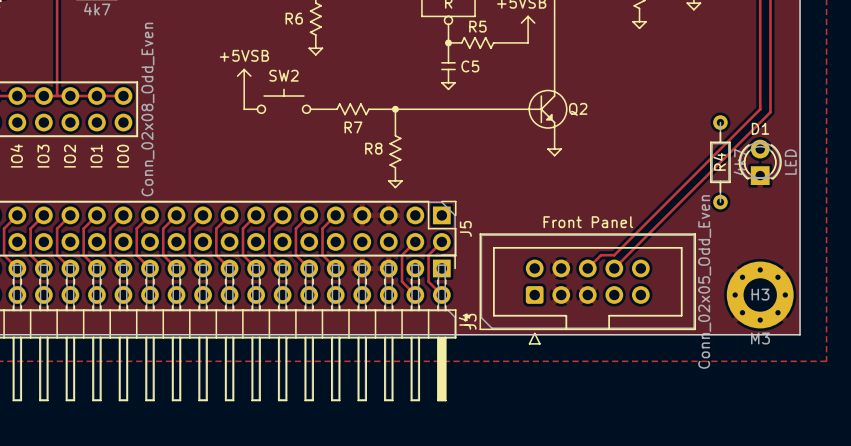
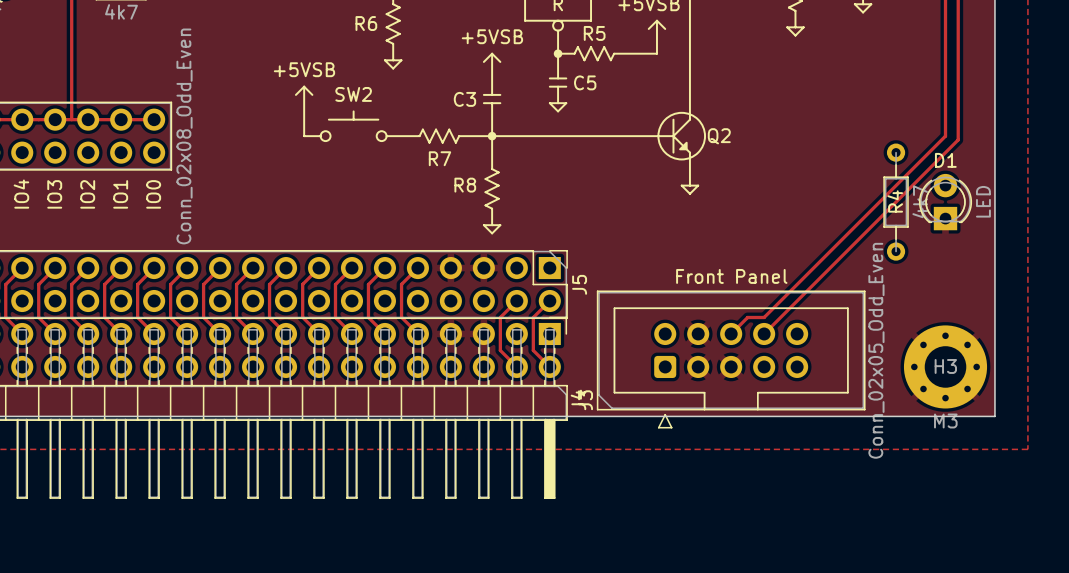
text: none -> +5VSB (492, 36)
line: none -> (492, 53) (492, 94)
line: none -> (492, 53) (483, 61)
line: none -> (492, 53) (500, 61)
line: none -> (483, 94) (500, 94)
text: none -> C3 (464, 99)
line: none -> (483, 103) (500, 103)
line: none -> (492, 103) (492, 136)

